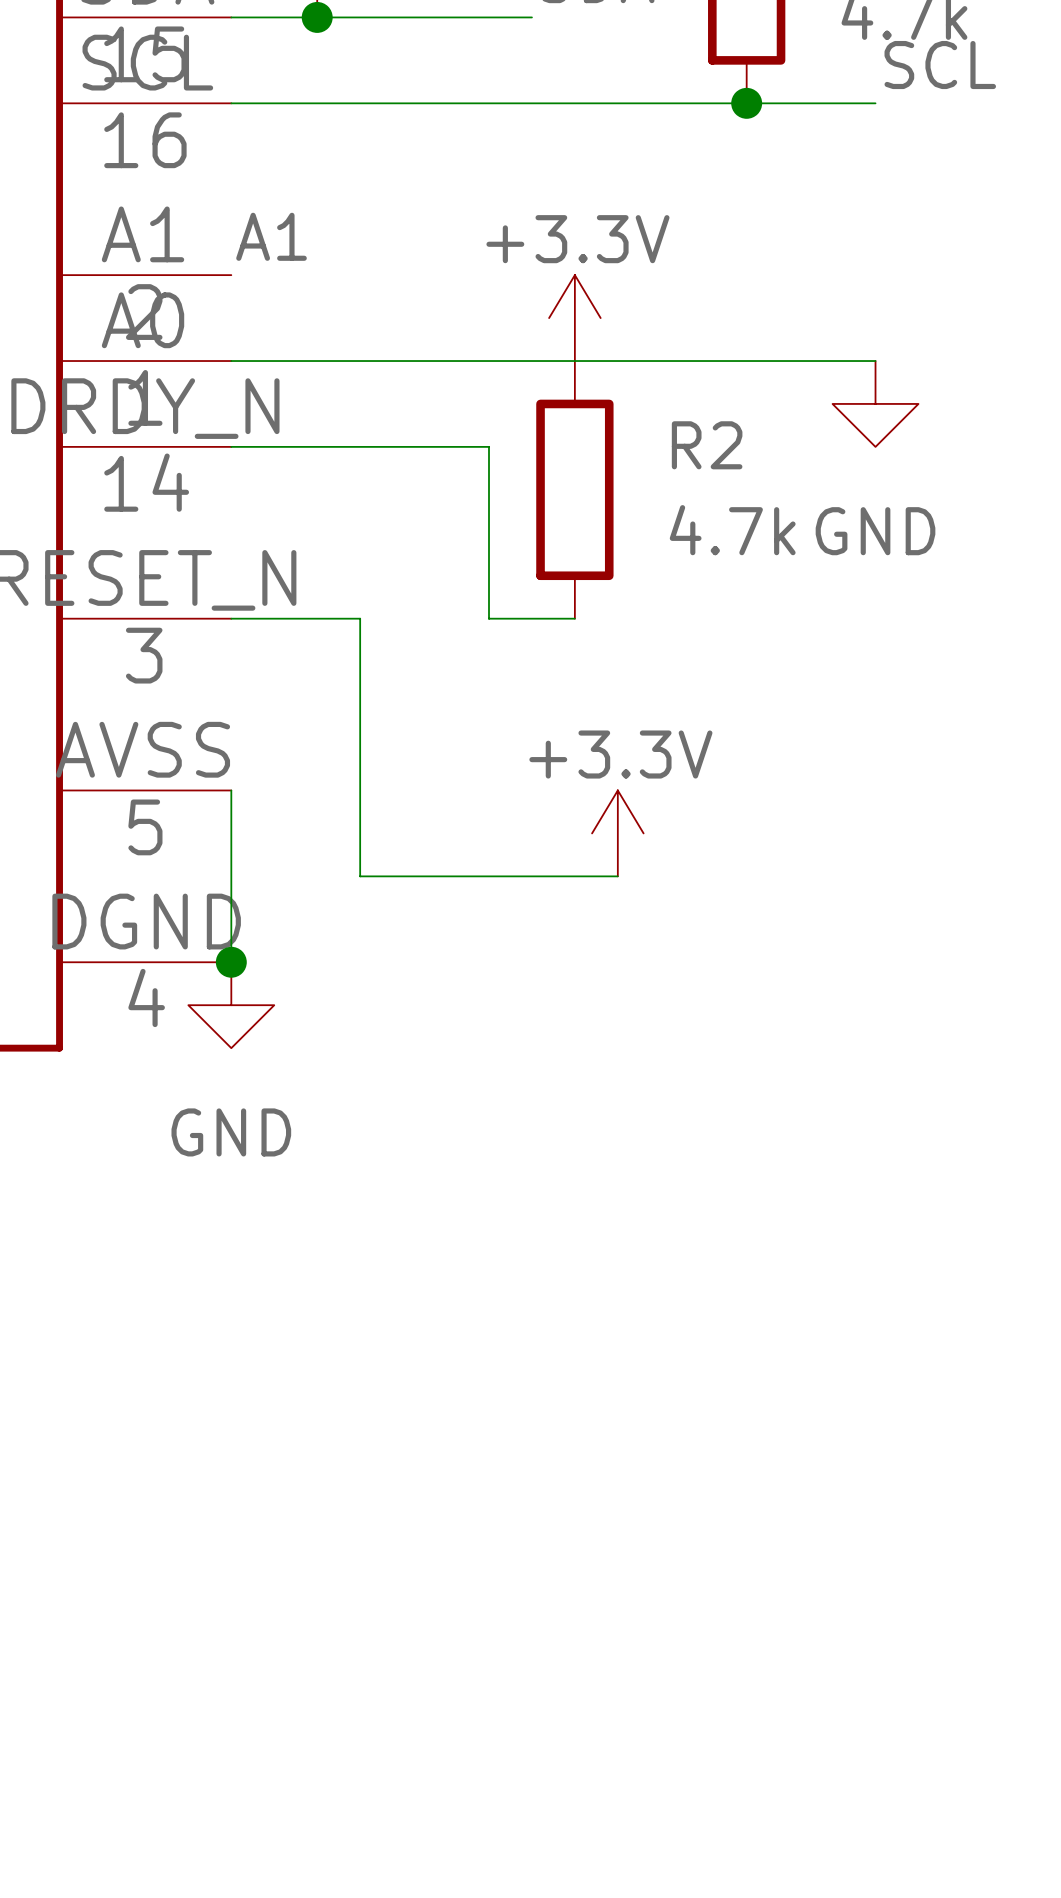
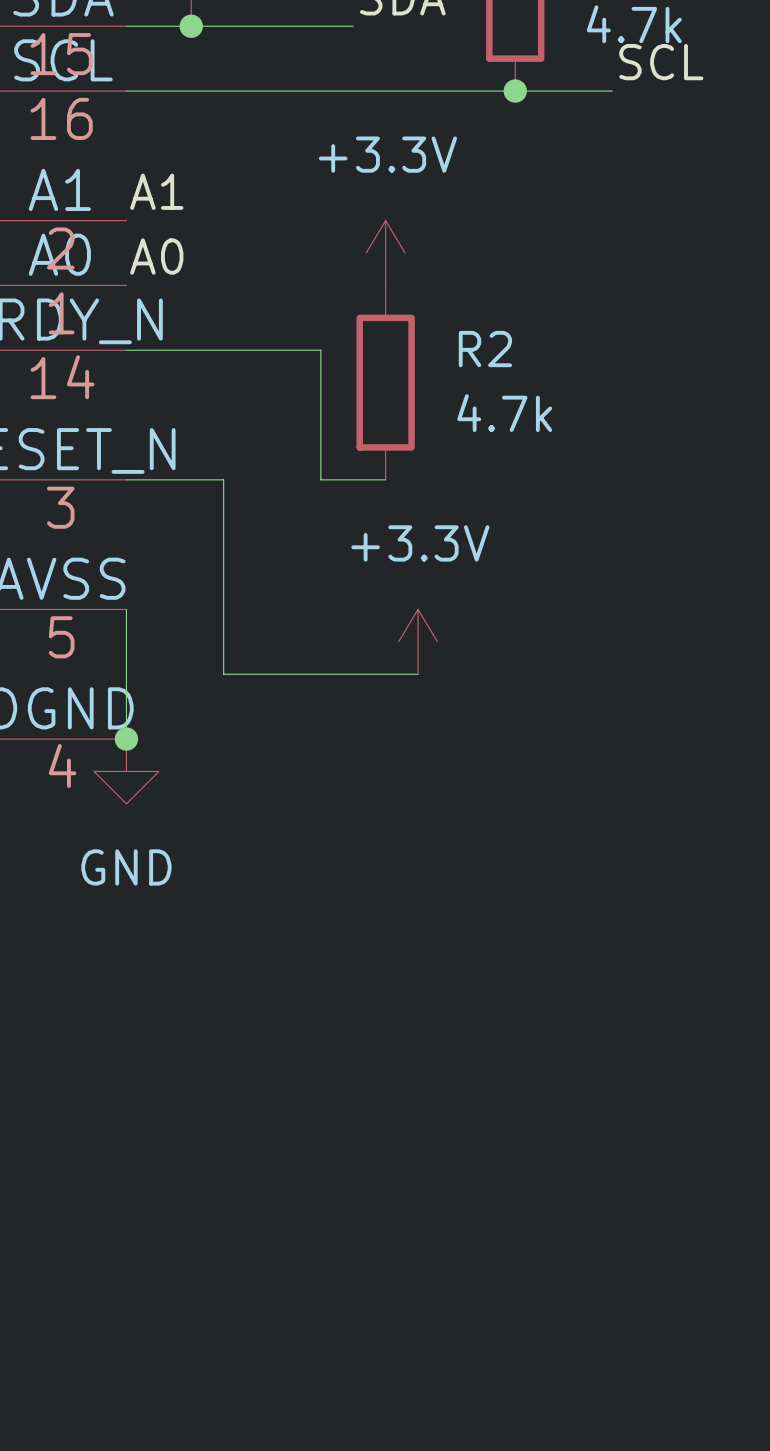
power symbol text position: +3.3V (577, 239) -> +3.3V (387, 154)
label: none -> A0 (156, 256)
wire: (231, 361) (875, 361) -> none
power symbol: GND (875, 403) -> none
power symbol text position: +3.3V (620, 754) -> +3.3V (420, 543)

